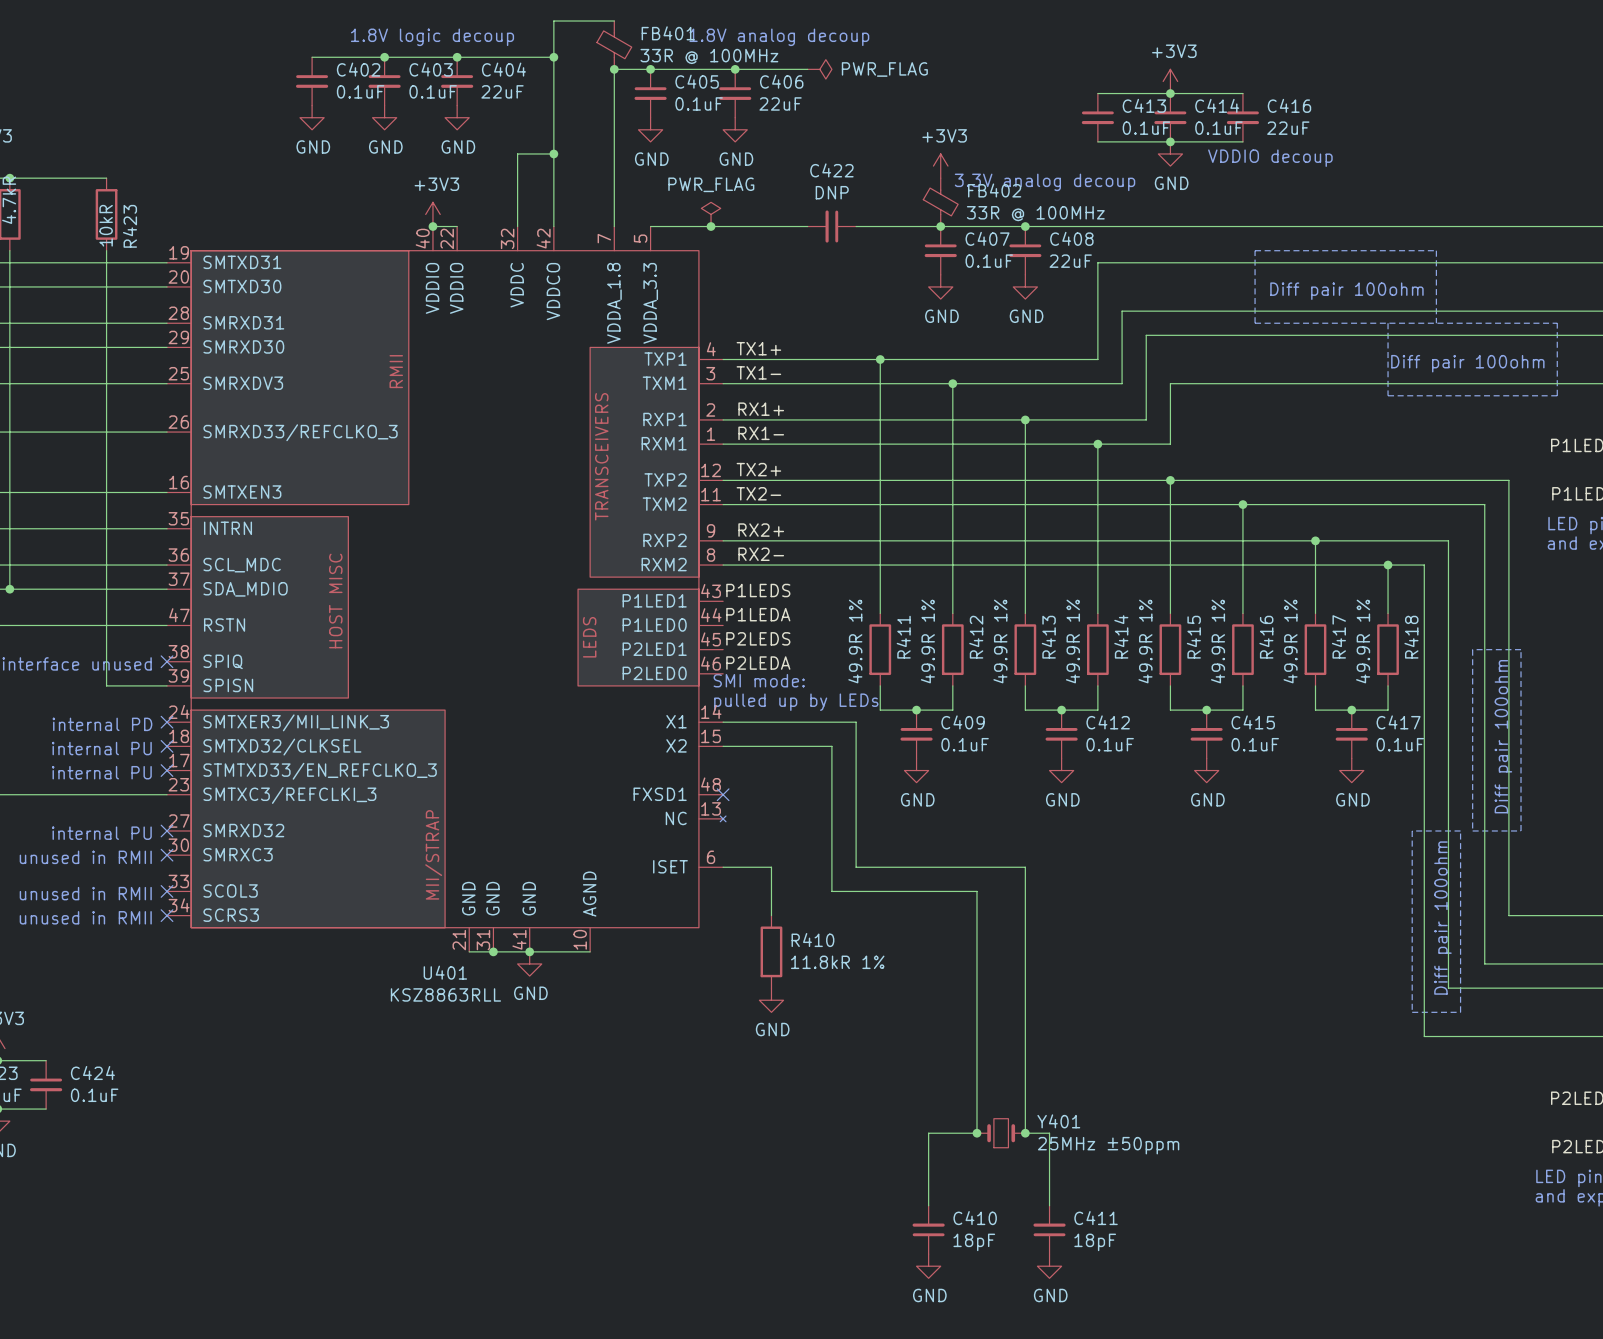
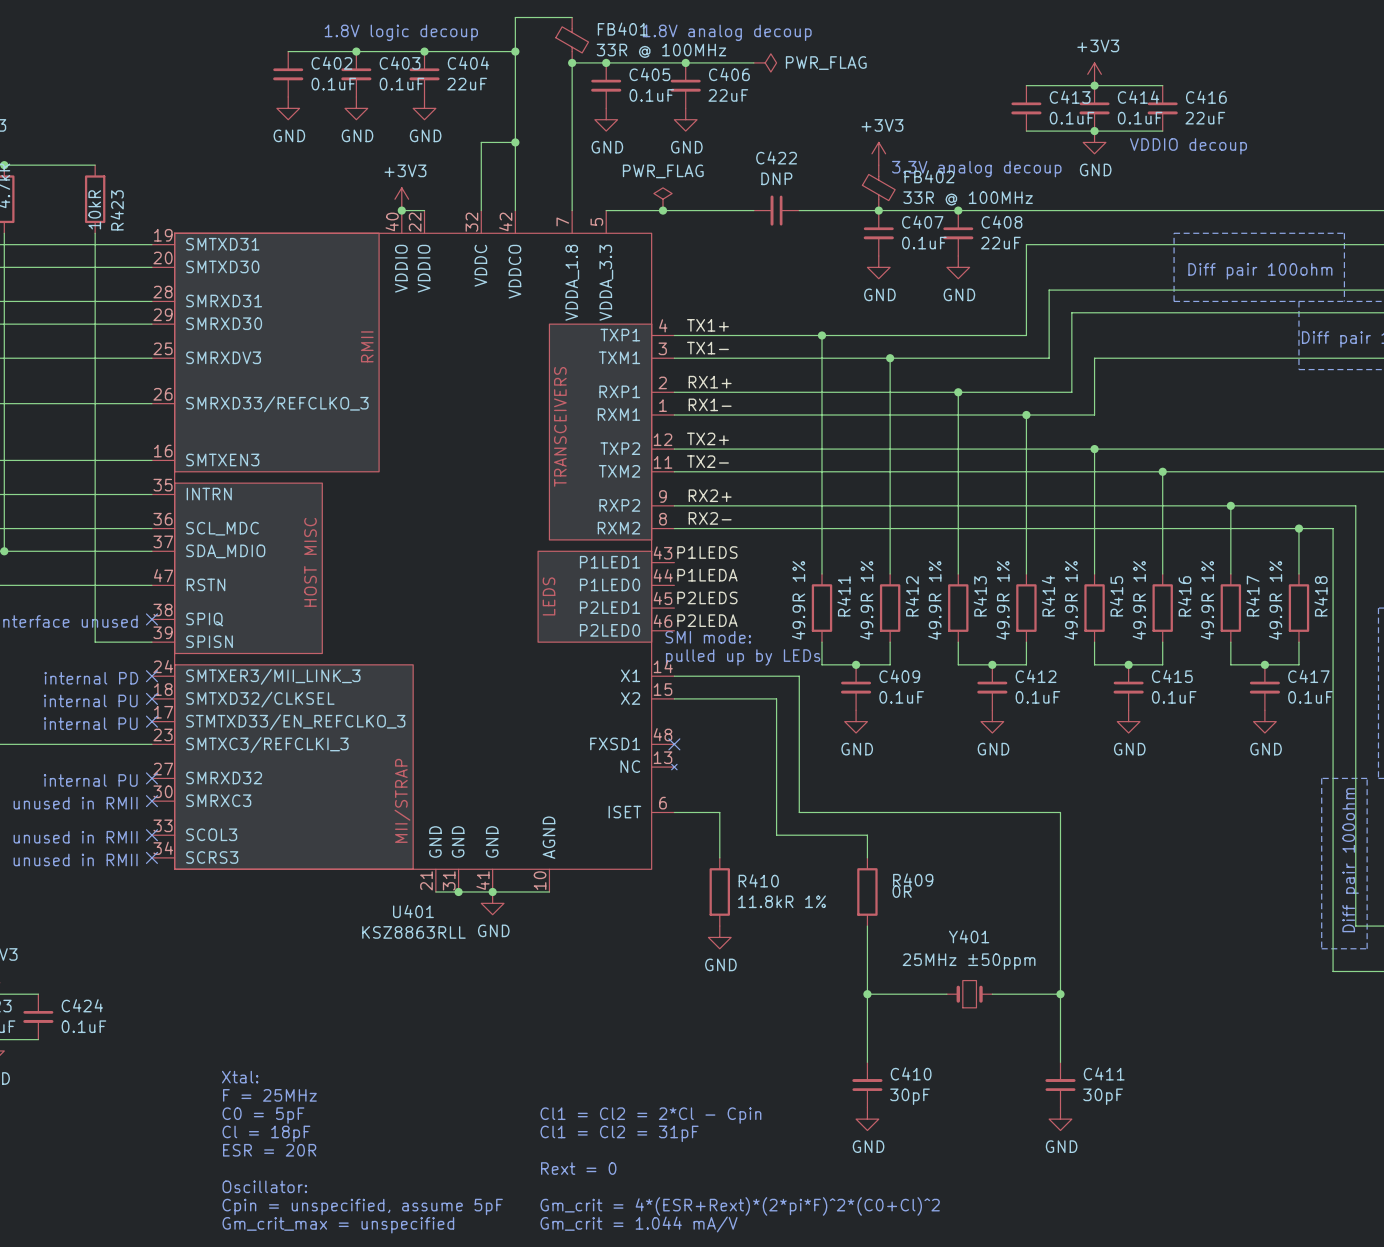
wire: (1025, 867) (1025, 1133) (1049, 1133) (1049, 1205) -> (958, 812) (1060, 812) (1060, 1062)
wire: (928, 891) (976, 891) (976, 1133) (928, 1133) (928, 1205) -> (867, 835) (867, 857)
R409: none -> 0R (867, 891)
wire: none -> (867, 926) (867, 1062)
wire: none -> (867, 994) (946, 994)
junction: none -> (867, 994)
wire: none -> (992, 994) (1060, 994)
junction: none -> (1060, 994)
Y401 name position: Y401 (1058, 1121) -> Y401 (969, 936)
junction: (976, 1133) -> none
Y401 position: (1001, 1133) -> (969, 994)
junction: (1025, 1133) -> none
Y401 value position: 25MHz ±50ppm (1108, 1145) -> 25MHz ±50ppm (969, 961)
text: none -> Xtal: (240, 1077)
text: none -> F = 25MHz (269, 1095)
text: none -> C0 = 5pF (263, 1115)
text: none -> Cl1 = Cl2 = 2*Cl - Cpin (650, 1115)
power symbol: none -> GND (867, 1119)
power symbol: none -> GND (1060, 1119)
text: none -> Cl = 18pF (266, 1133)
text: none -> Cl1 = Cl2 = 31pF (619, 1133)
text: none -> ESR = 20R (269, 1150)
C410 position: (928, 1229) -> (867, 1085)
C411 position: (1049, 1229) -> (1060, 1085)
C410 value: 18pF (974, 1242) -> 30pF (910, 1096)
C411 value: 18pF (1095, 1242) -> 30pF (1103, 1096)
text: none -> Rext = 0 (578, 1168)
text: none -> Oscillator: (264, 1186)
power symbol: GND (928, 1266) -> none
power symbol: GND (1049, 1266) -> none
text: none -> Gm_crit = 4*(ESR+Rext)*(2*pi*F)^2*(C0+Cl)^2 (740, 1206)
text: none -> Cpin = unspecified, assume 5pF (362, 1206)
text: none -> Gm_crit = 1.044 mA/V (639, 1224)
text: none -> Gm_crit_max = unspecified (338, 1225)

